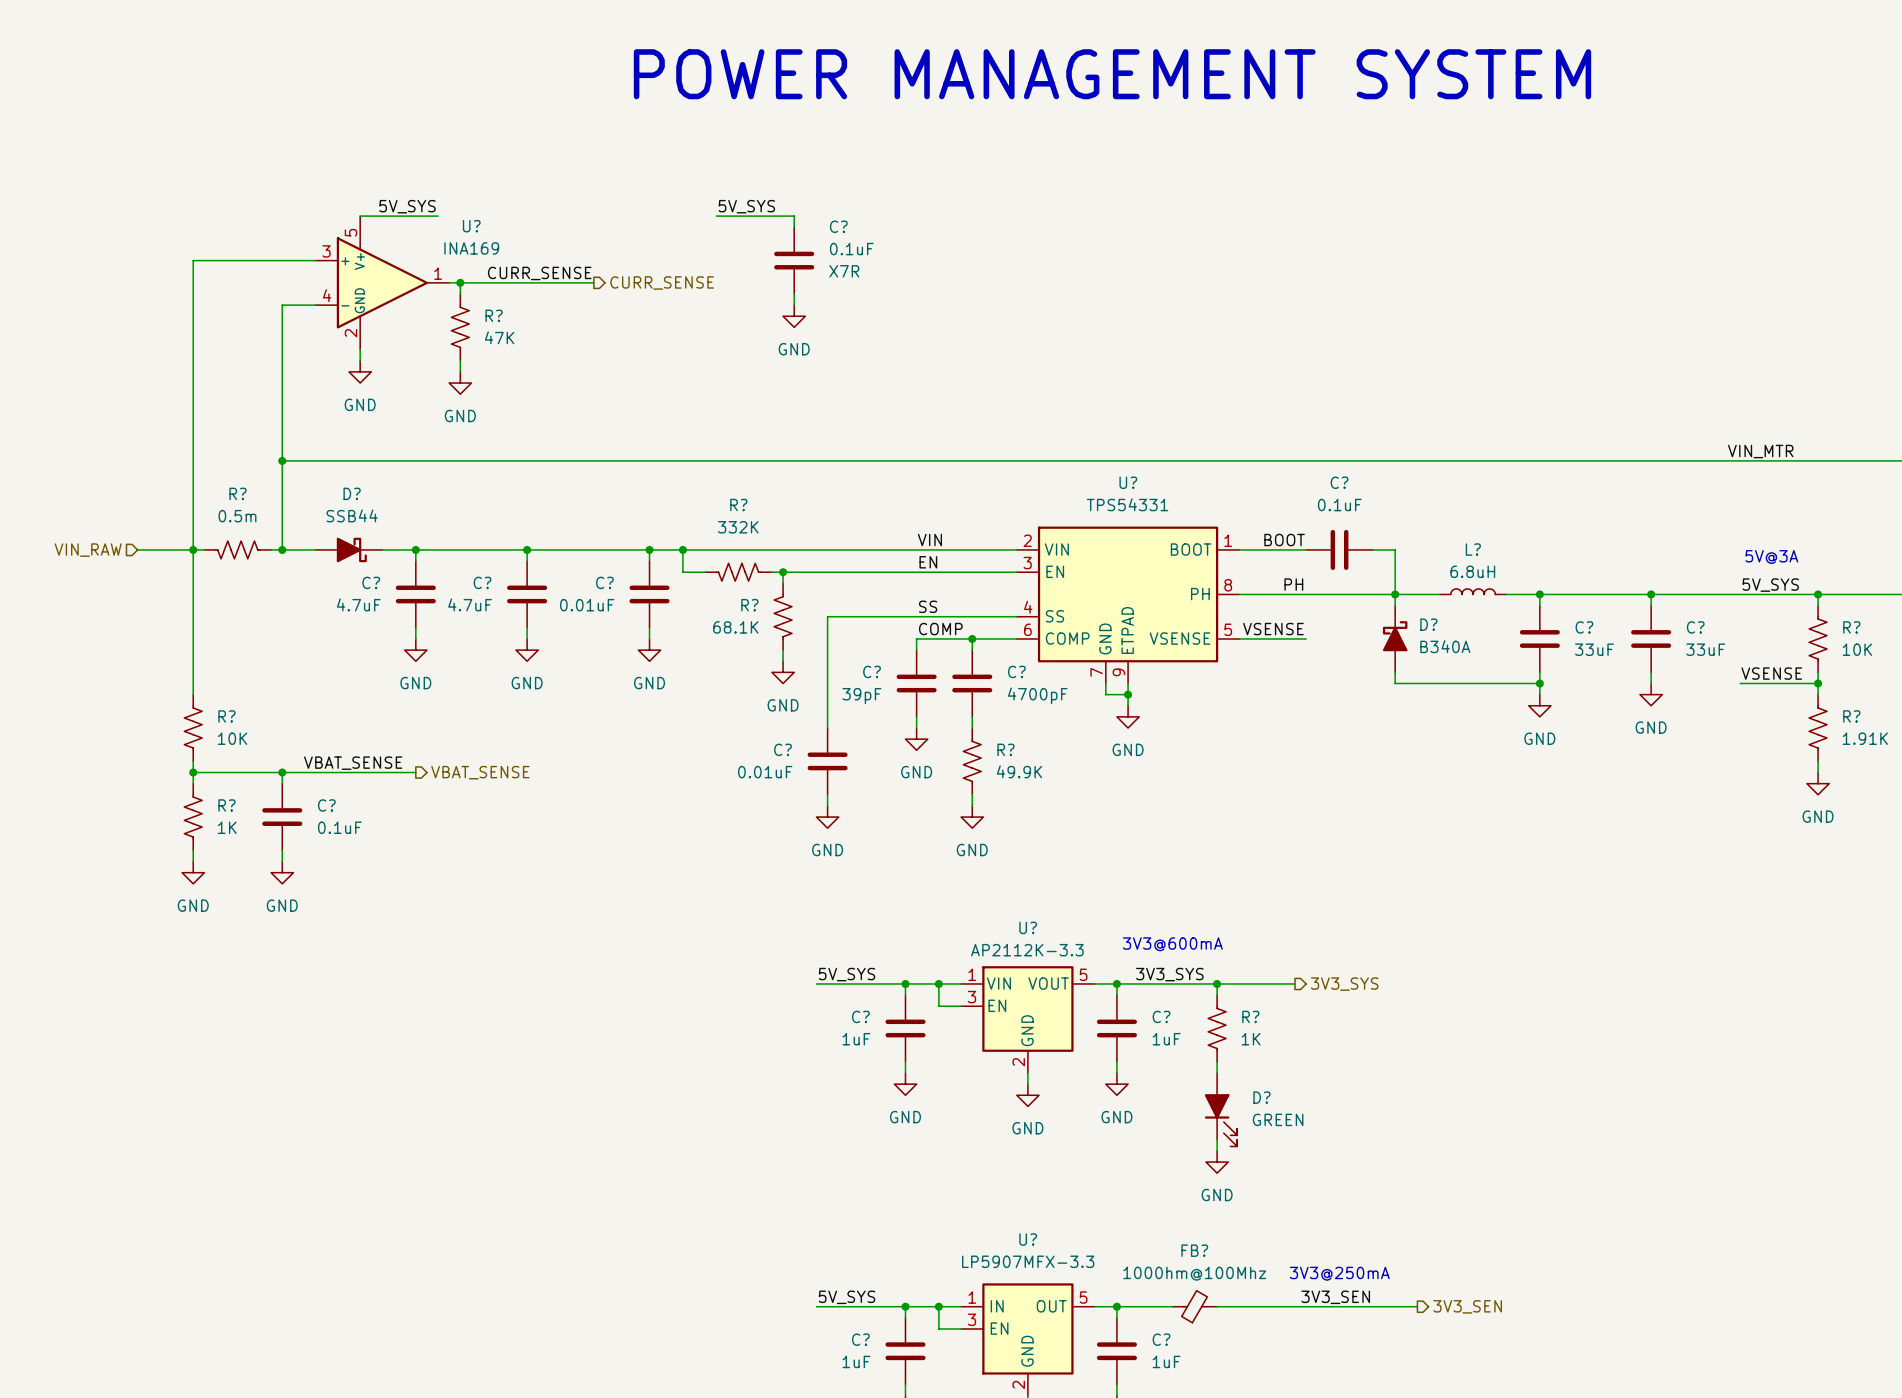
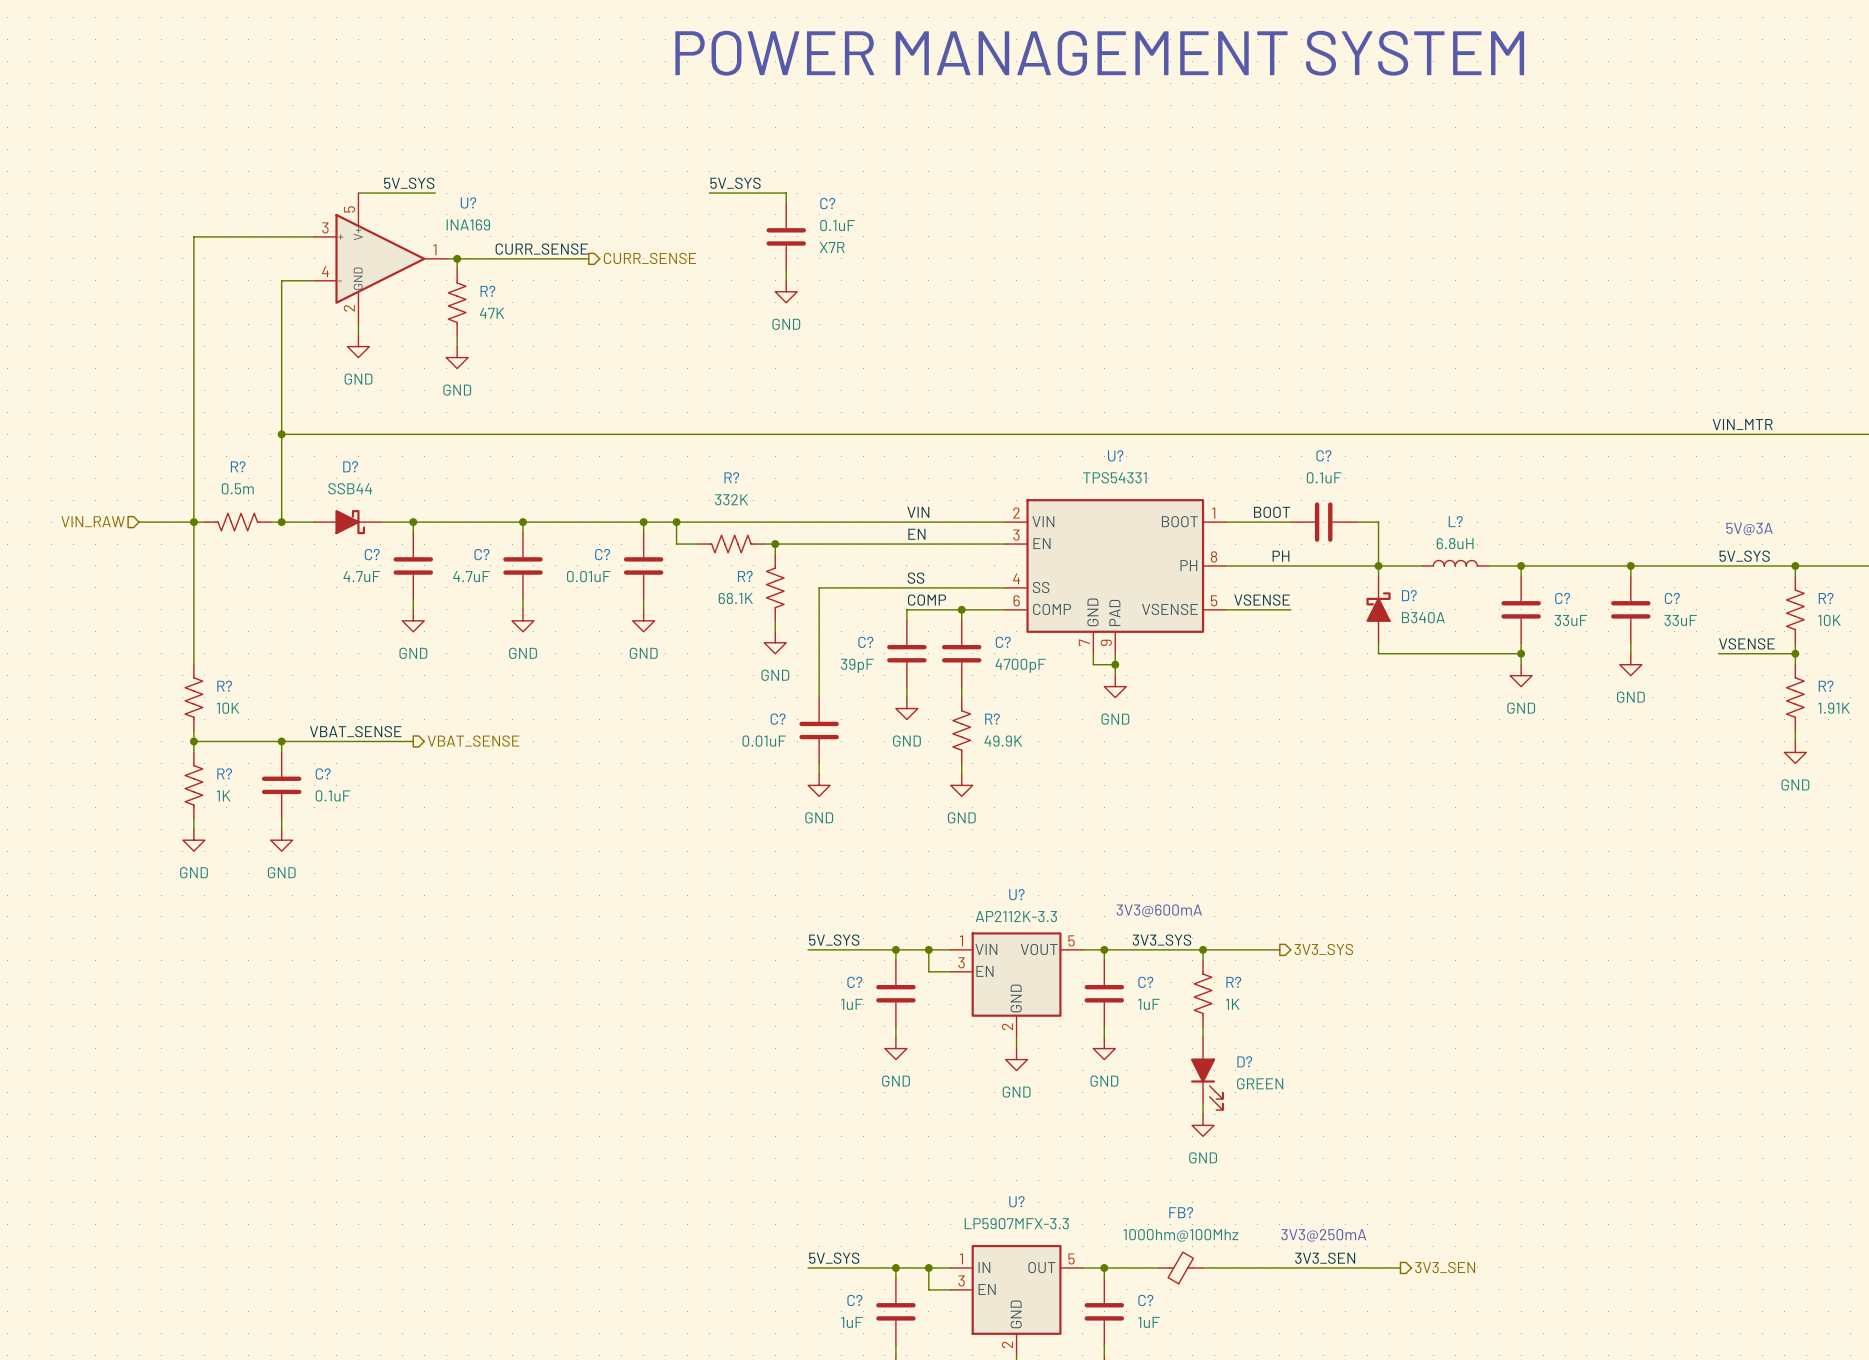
U? pin name: ETPAD (1127, 630) -> PAD (1114, 612)

